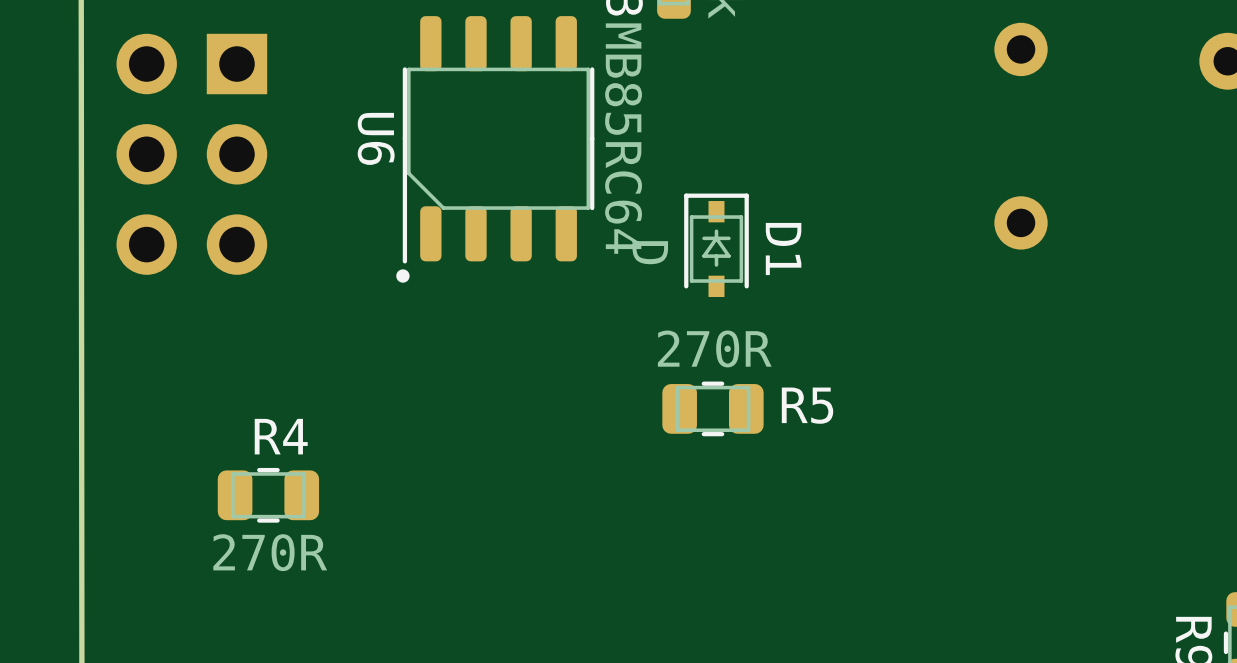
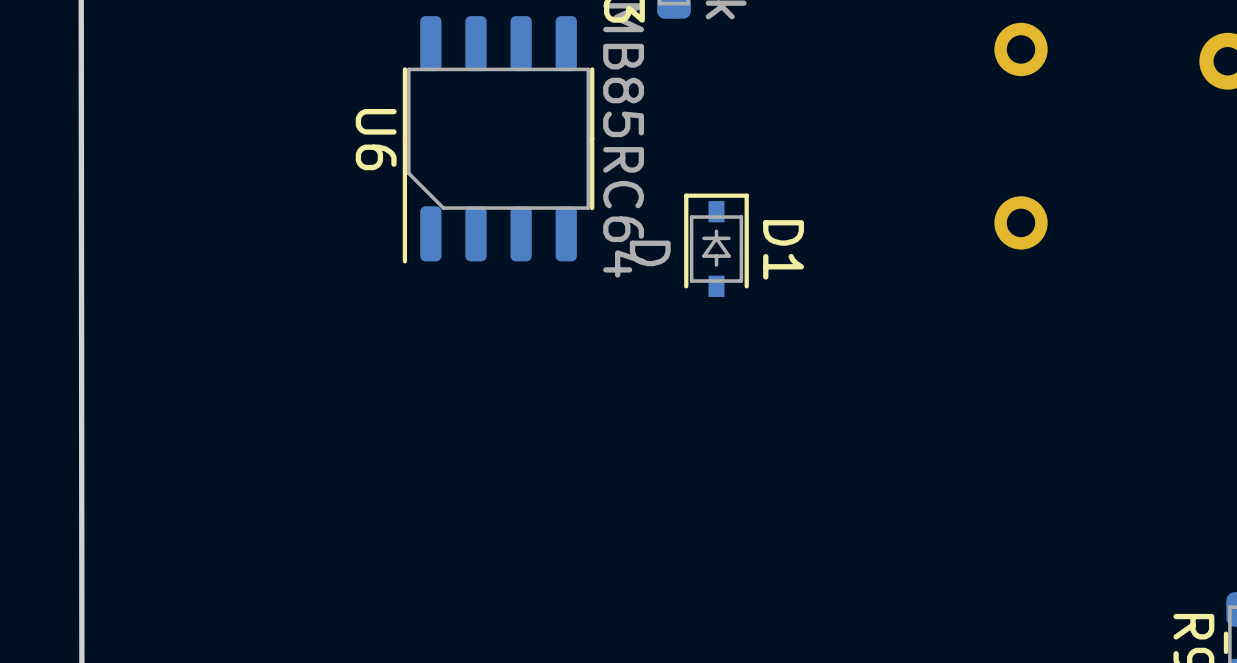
part: (191, 154) -> none
drawing: [396, 269, 410, 283] -> none
R5: 270R (712, 408) -> none
R4: 270R (268, 495) -> none

